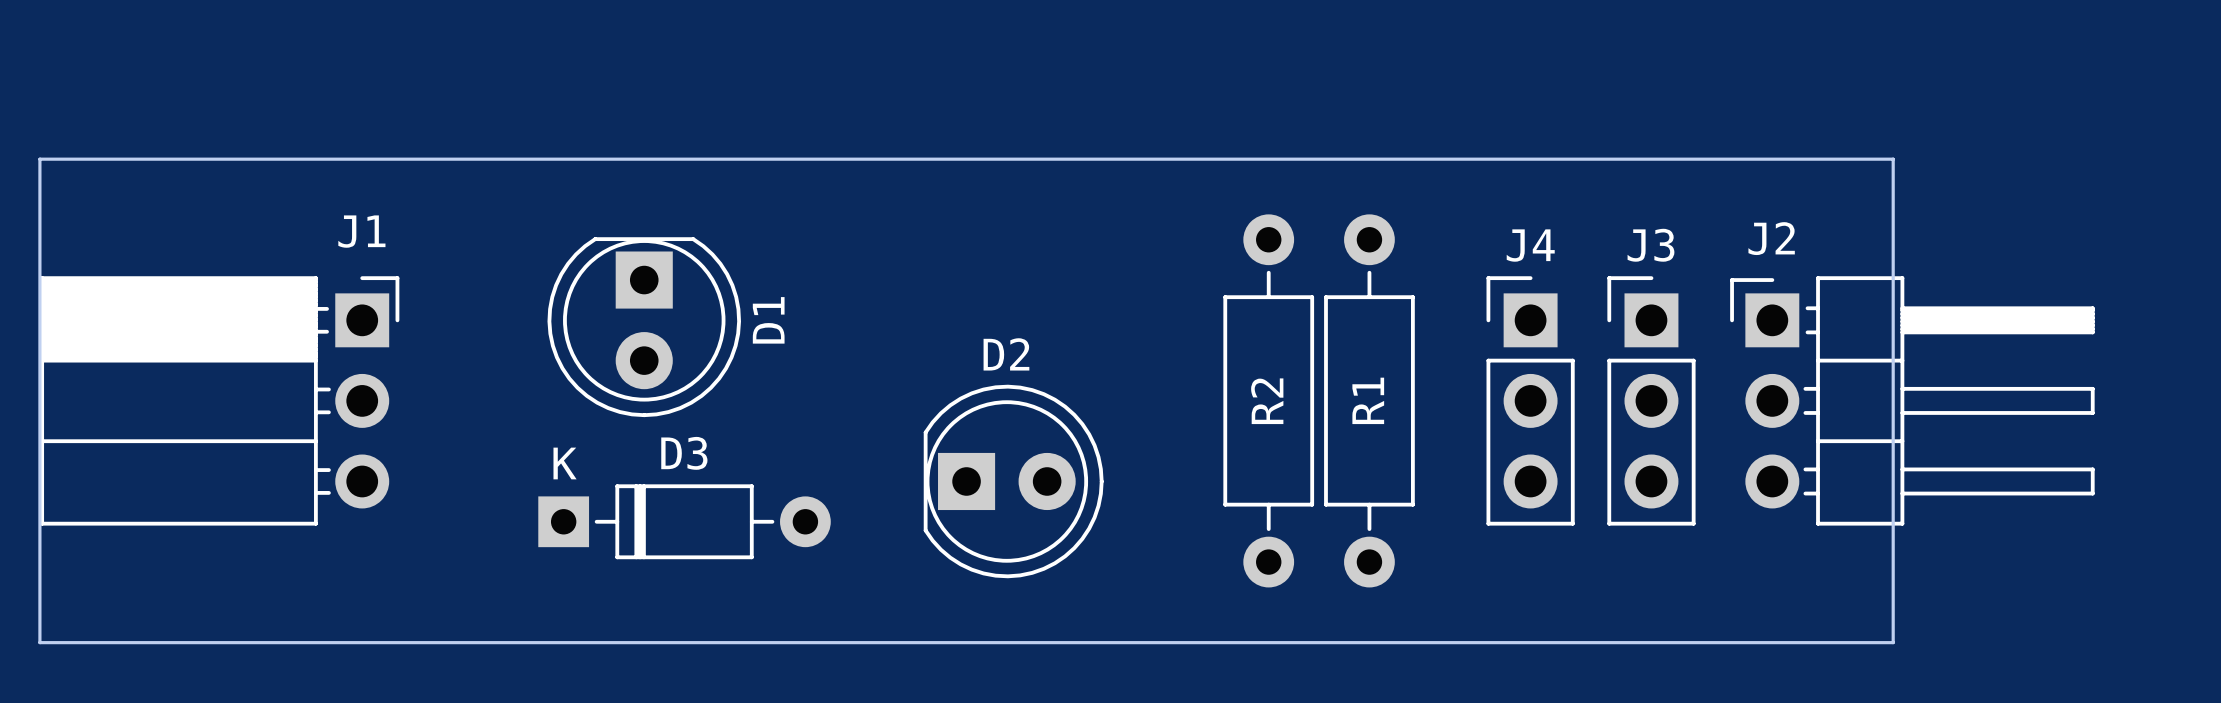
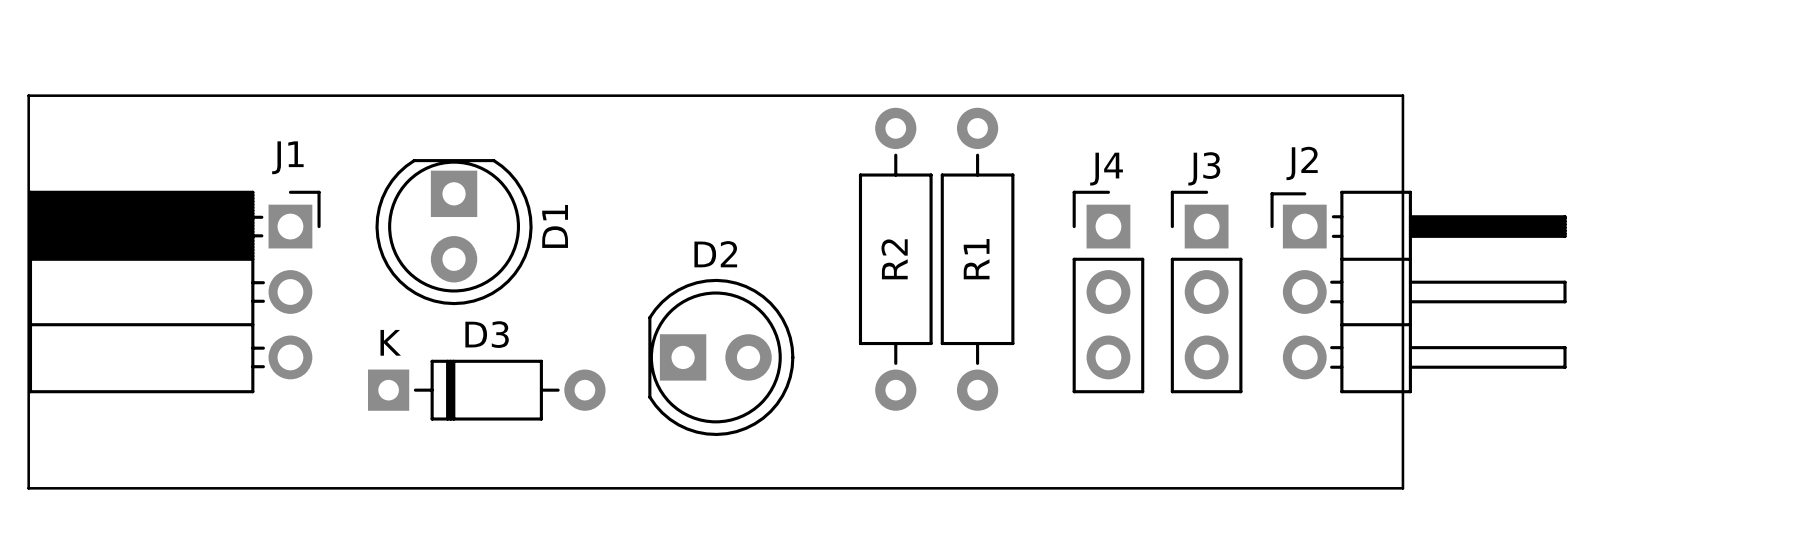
board edge: (1732, 159) (1893, 159) (1893, 642) (1732, 642) -> (1402, 95) (1402, 488)
D1 position: (644, 327) -> (454, 232)
R2 position: (1268, 400) -> (895, 259)
R1 position: (1369, 400) -> (977, 259)
J4 position: (1530, 400) -> (1108, 291)
J3 position: (1651, 400) -> (1206, 291)
J2 position: (1912, 400) -> (1418, 291)
D2 position: (1013, 481) -> (721, 357)
D3 position: (684, 521) -> (486, 390)

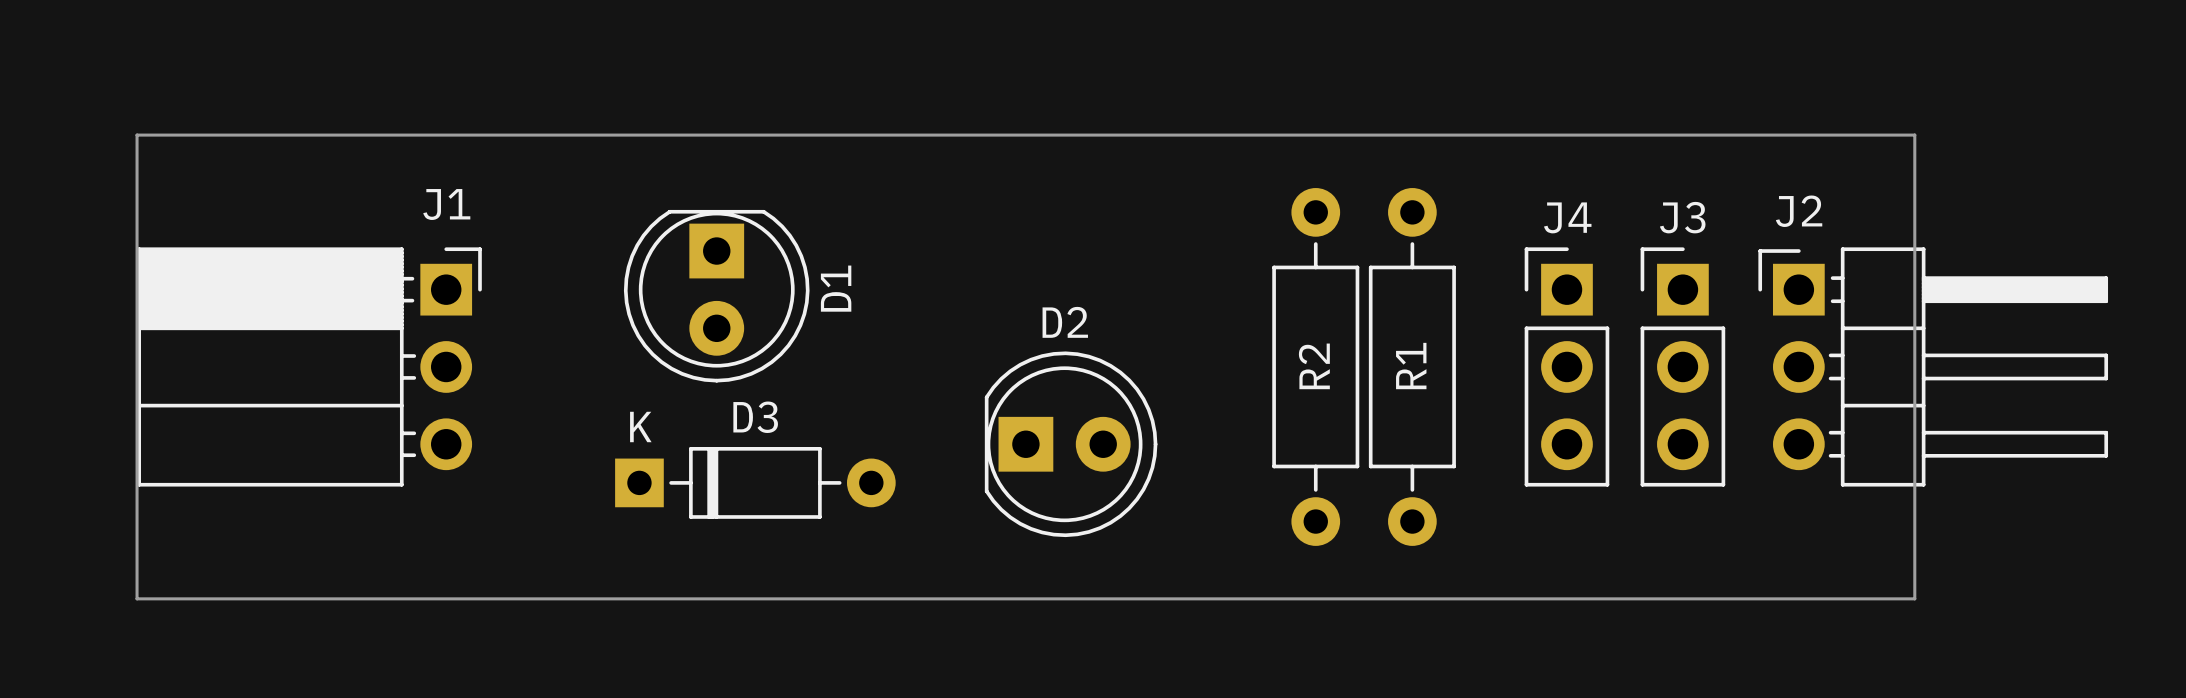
board edge: (1402, 95) (1402, 488) -> (1760, 135) (1914, 135) (1914, 598) (1760, 598)
D1 position: (454, 232) -> (716, 296)
R2 position: (895, 259) -> (1315, 366)
R1 position: (977, 259) -> (1412, 366)
J4 position: (1108, 291) -> (1566, 366)
J3 position: (1206, 291) -> (1682, 366)
J2 position: (1418, 291) -> (1933, 366)
D2 position: (721, 357) -> (1071, 444)
D3 position: (486, 390) -> (755, 482)

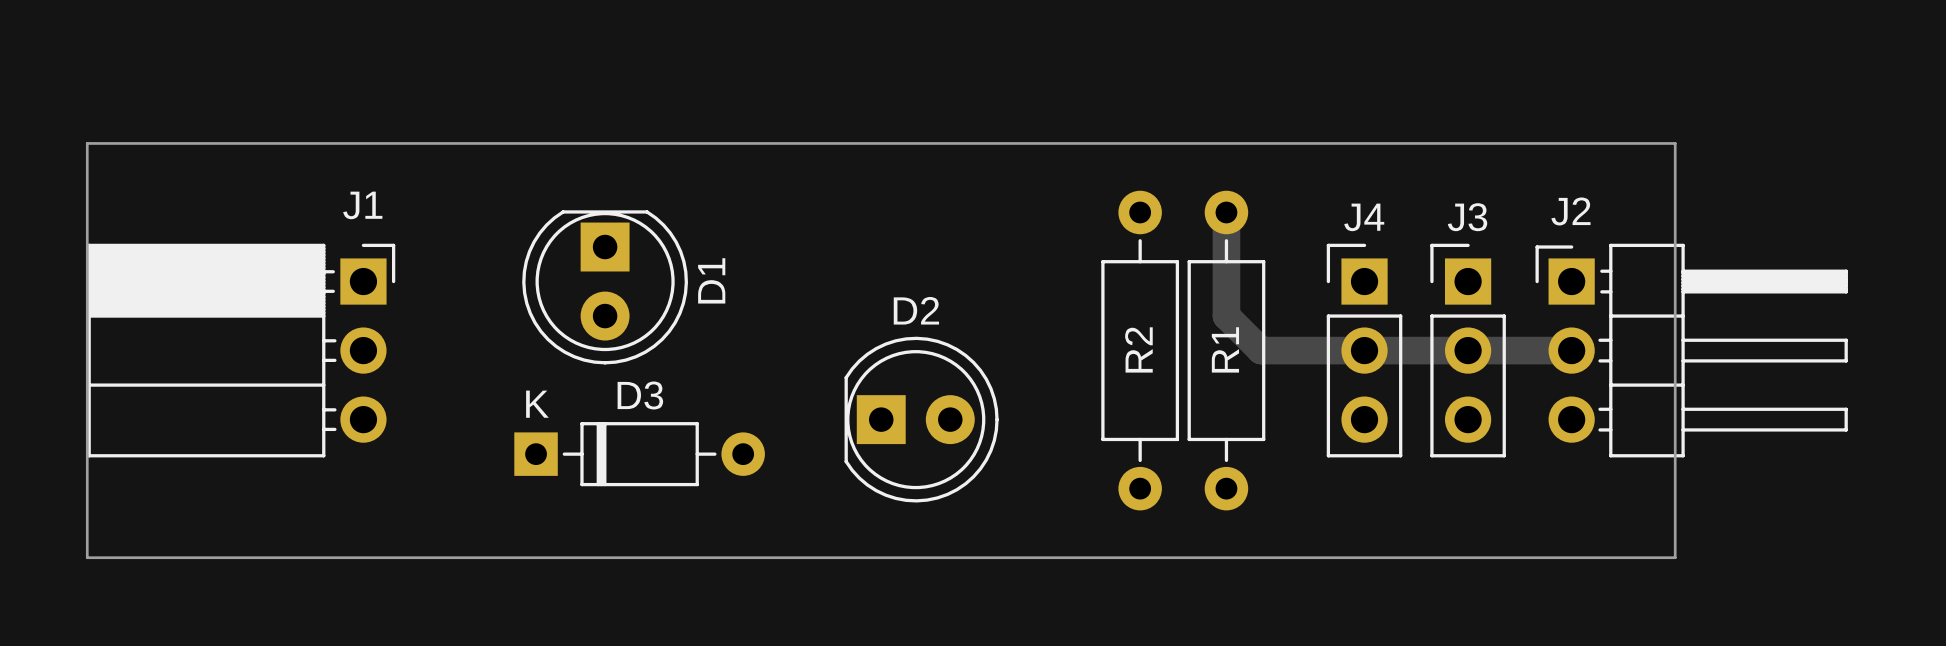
track: none -> (1226, 212) (1226, 316) (1260, 350) (1571, 350)

